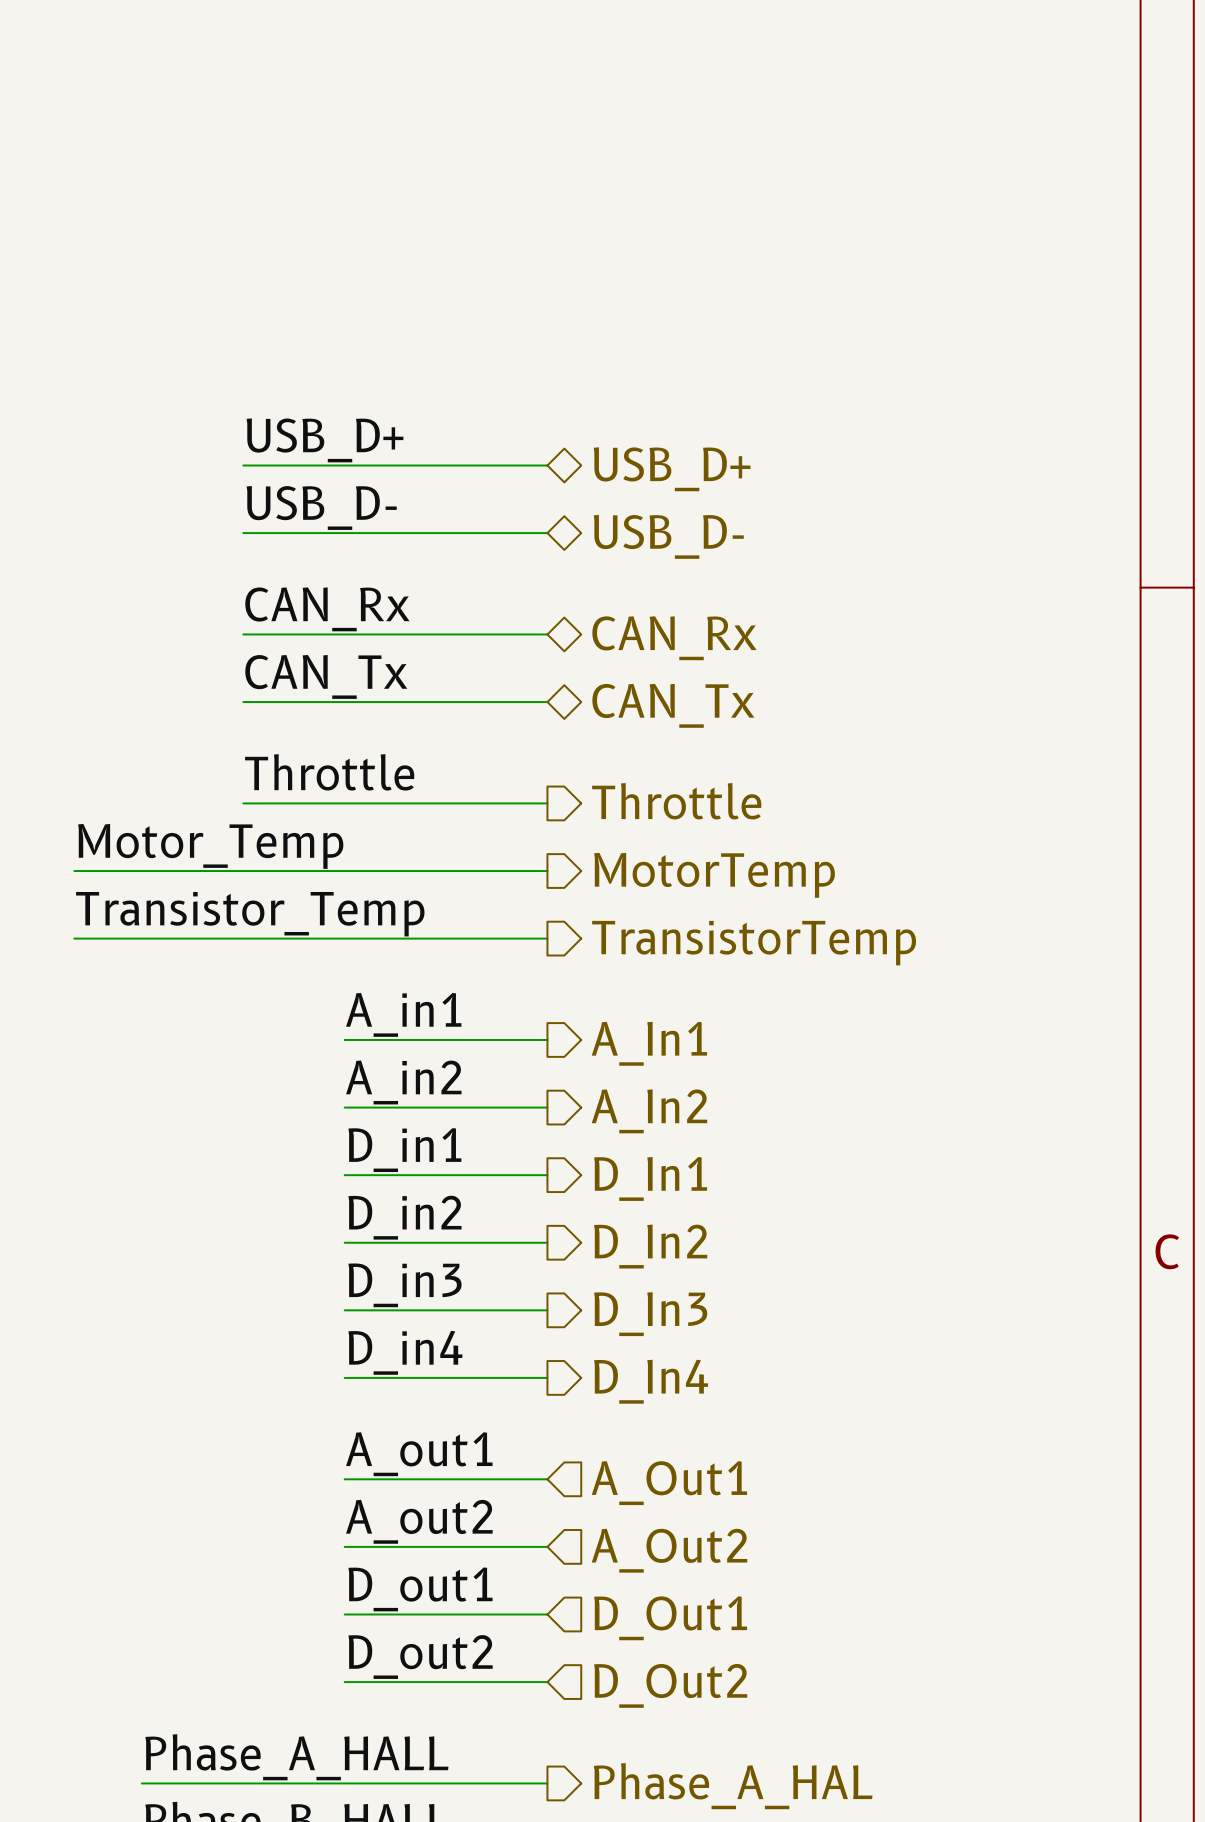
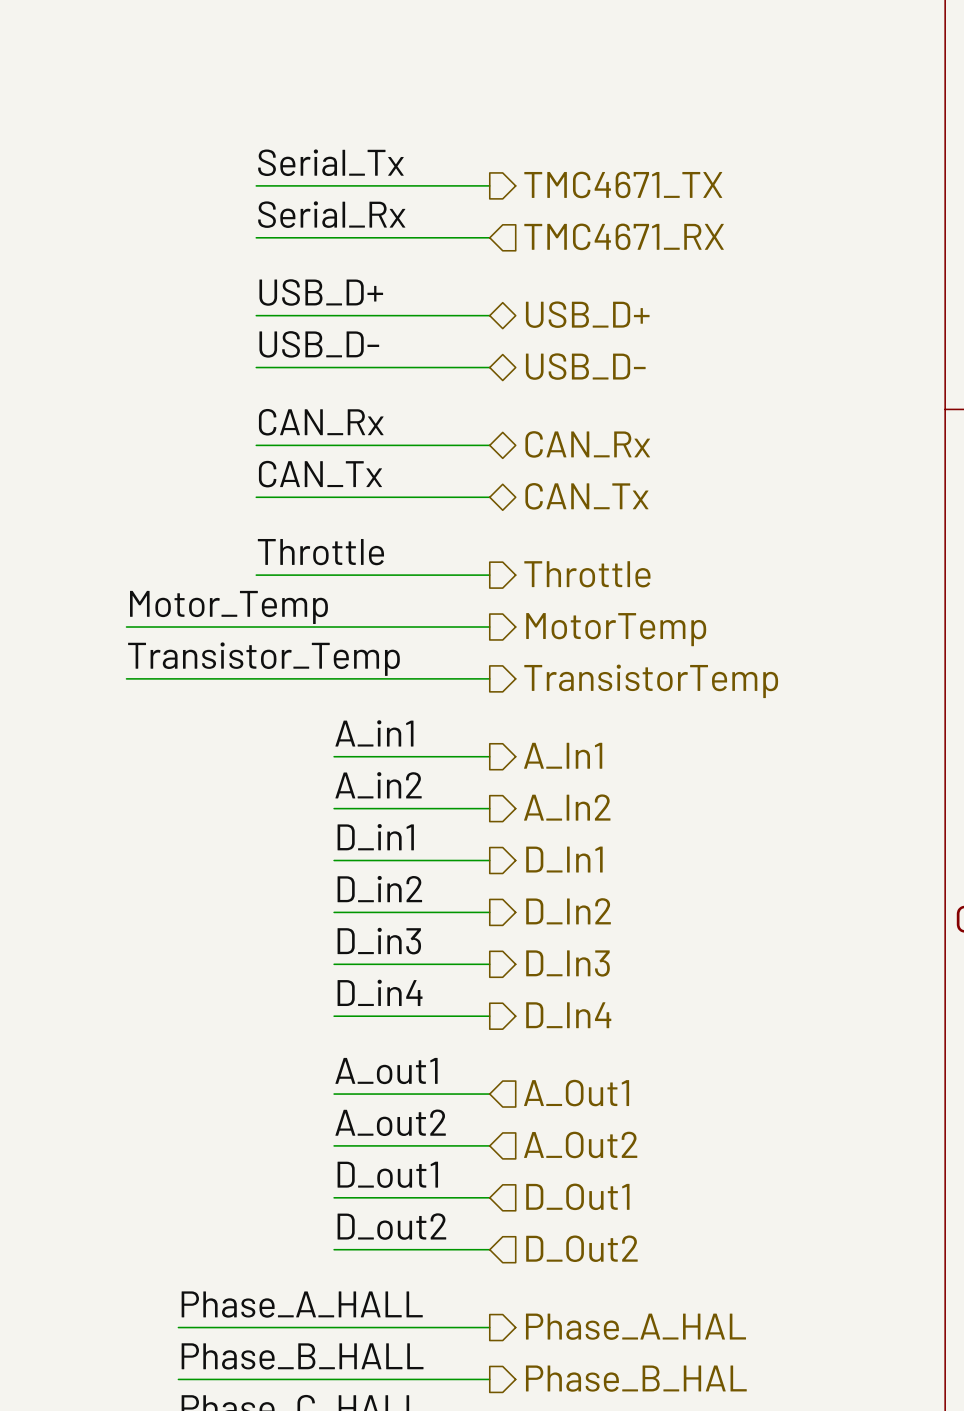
label: none -> Serial_Tx (330, 162)
wire: none -> (256, 185) (489, 185)
hierarchical label: none -> TMC4671_TX (623, 184)
label: none -> Serial_Rx (331, 214)
wire: none -> (256, 237) (489, 237)
hierarchical label: none -> TMC4671_RX (624, 236)

